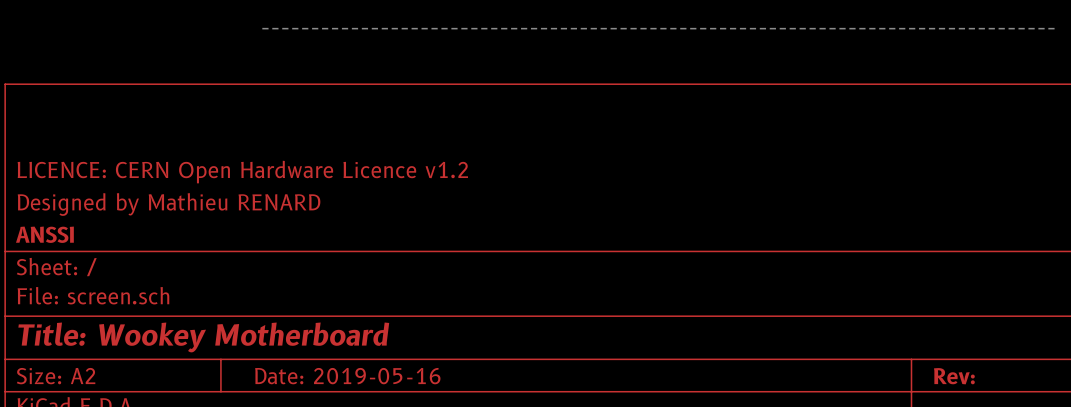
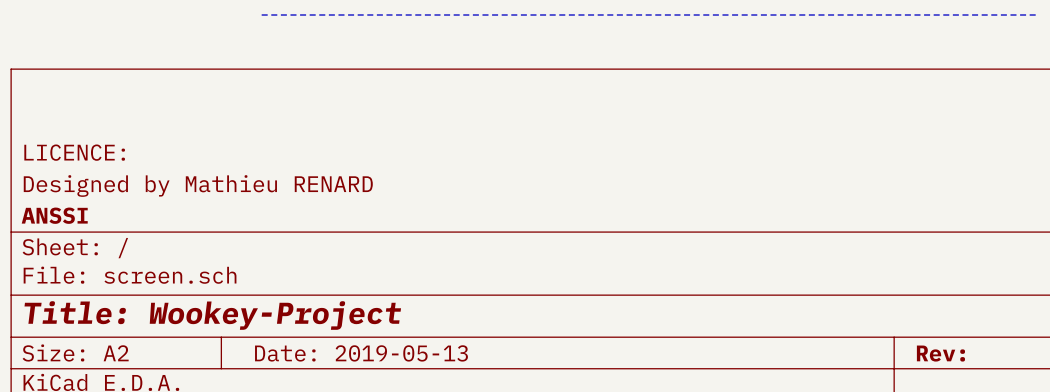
title block: LICENCE: CERN Open Hardware Licence v1.2 (242, 172) -> LICENCE: (74, 152)
title block: Title: Wookey Motherboard (203, 337) -> Title: Wookey-Project (212, 315)
title block: Date: 2019-05-16 (347, 376) -> Date: 2019-05-13 (361, 353)

